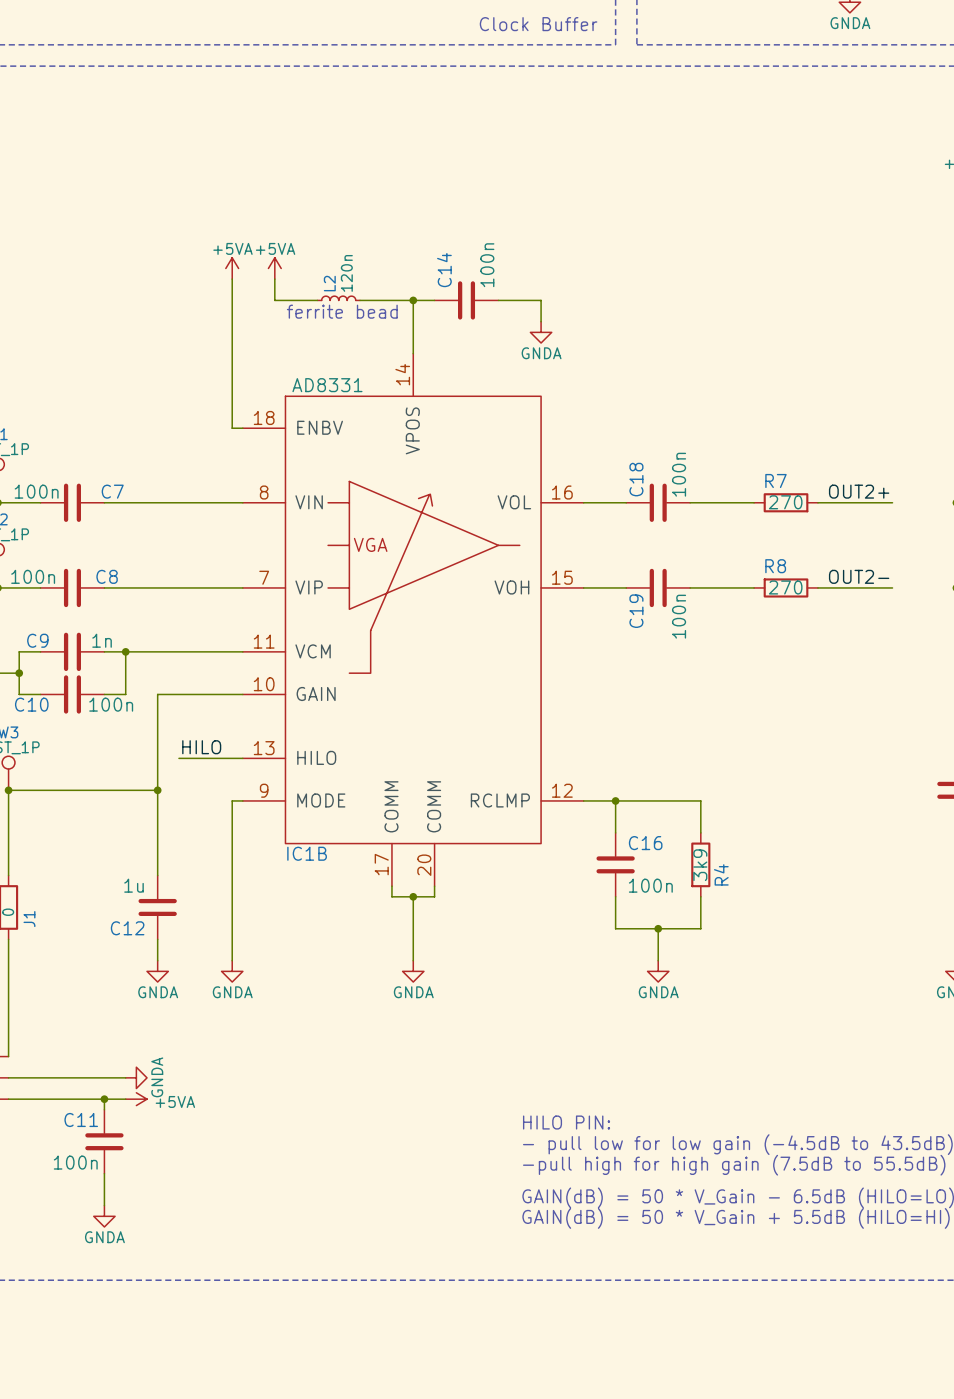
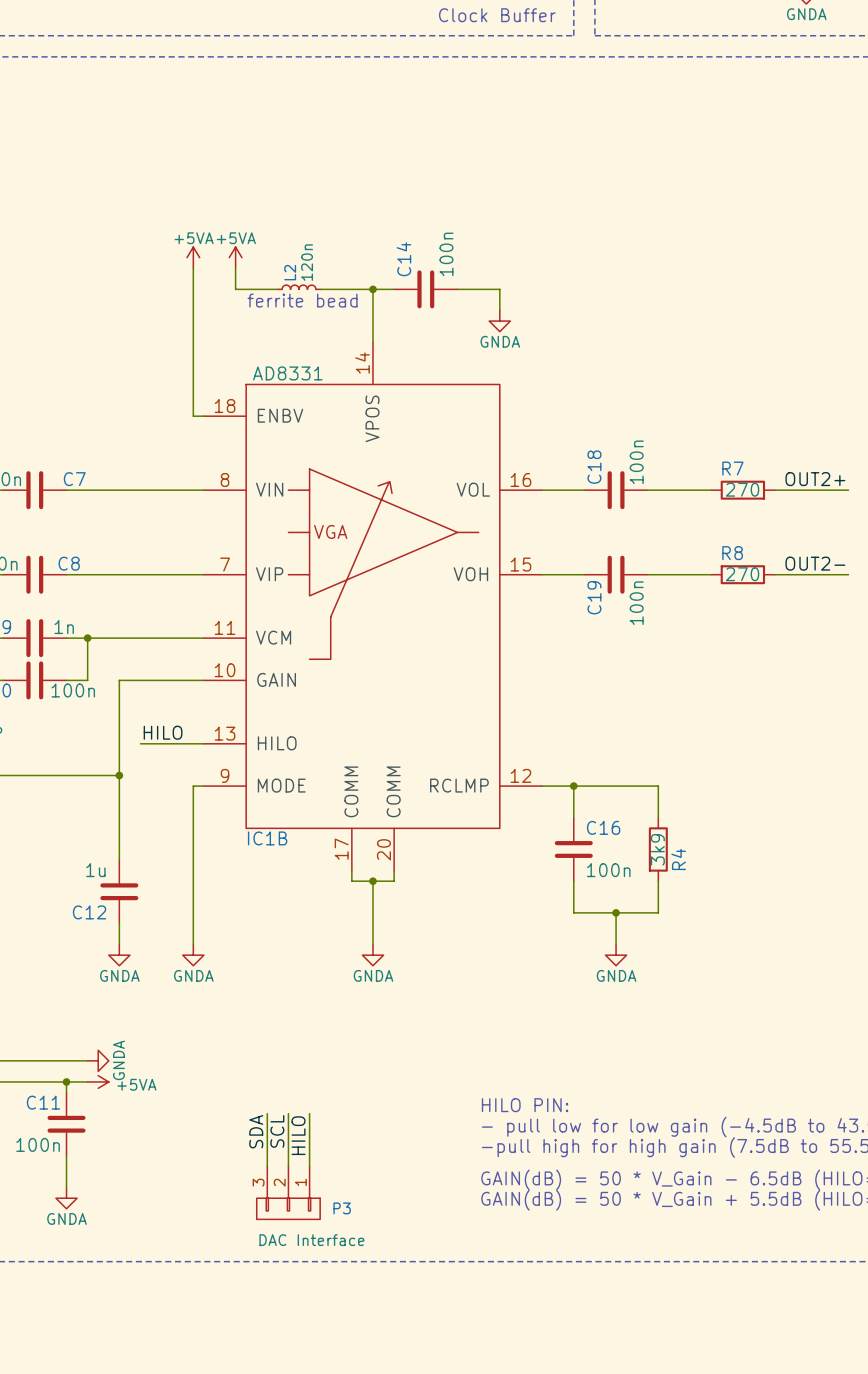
wire: none -> (267, 1113) (267, 1166)
wire: none -> (288, 1113) (288, 1166)
wire: none -> (309, 1113) (309, 1166)
label: none -> SDA (256, 1131)
label: none -> SCL (277, 1131)
label: none -> HILO (298, 1135)
P3: none -> DAC Interface (288, 1192)

